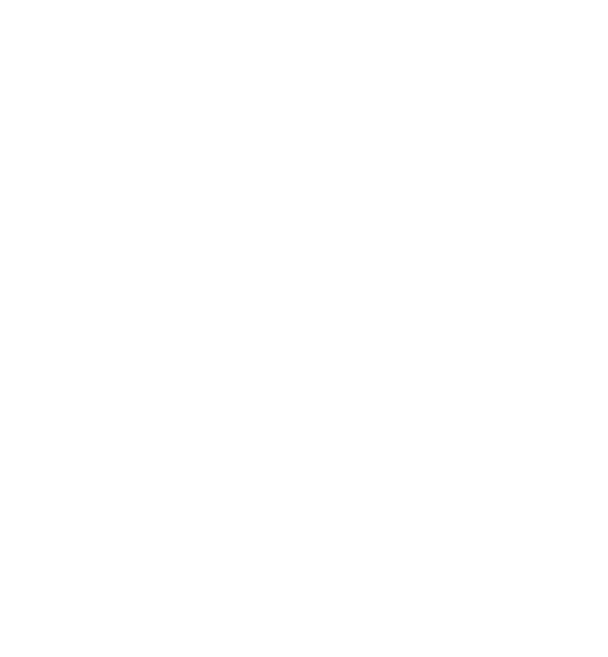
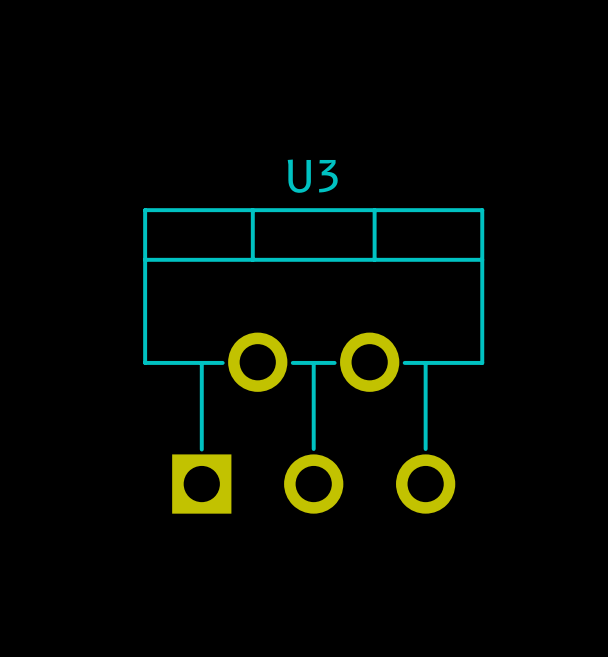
U3: none -> (313, 360)

